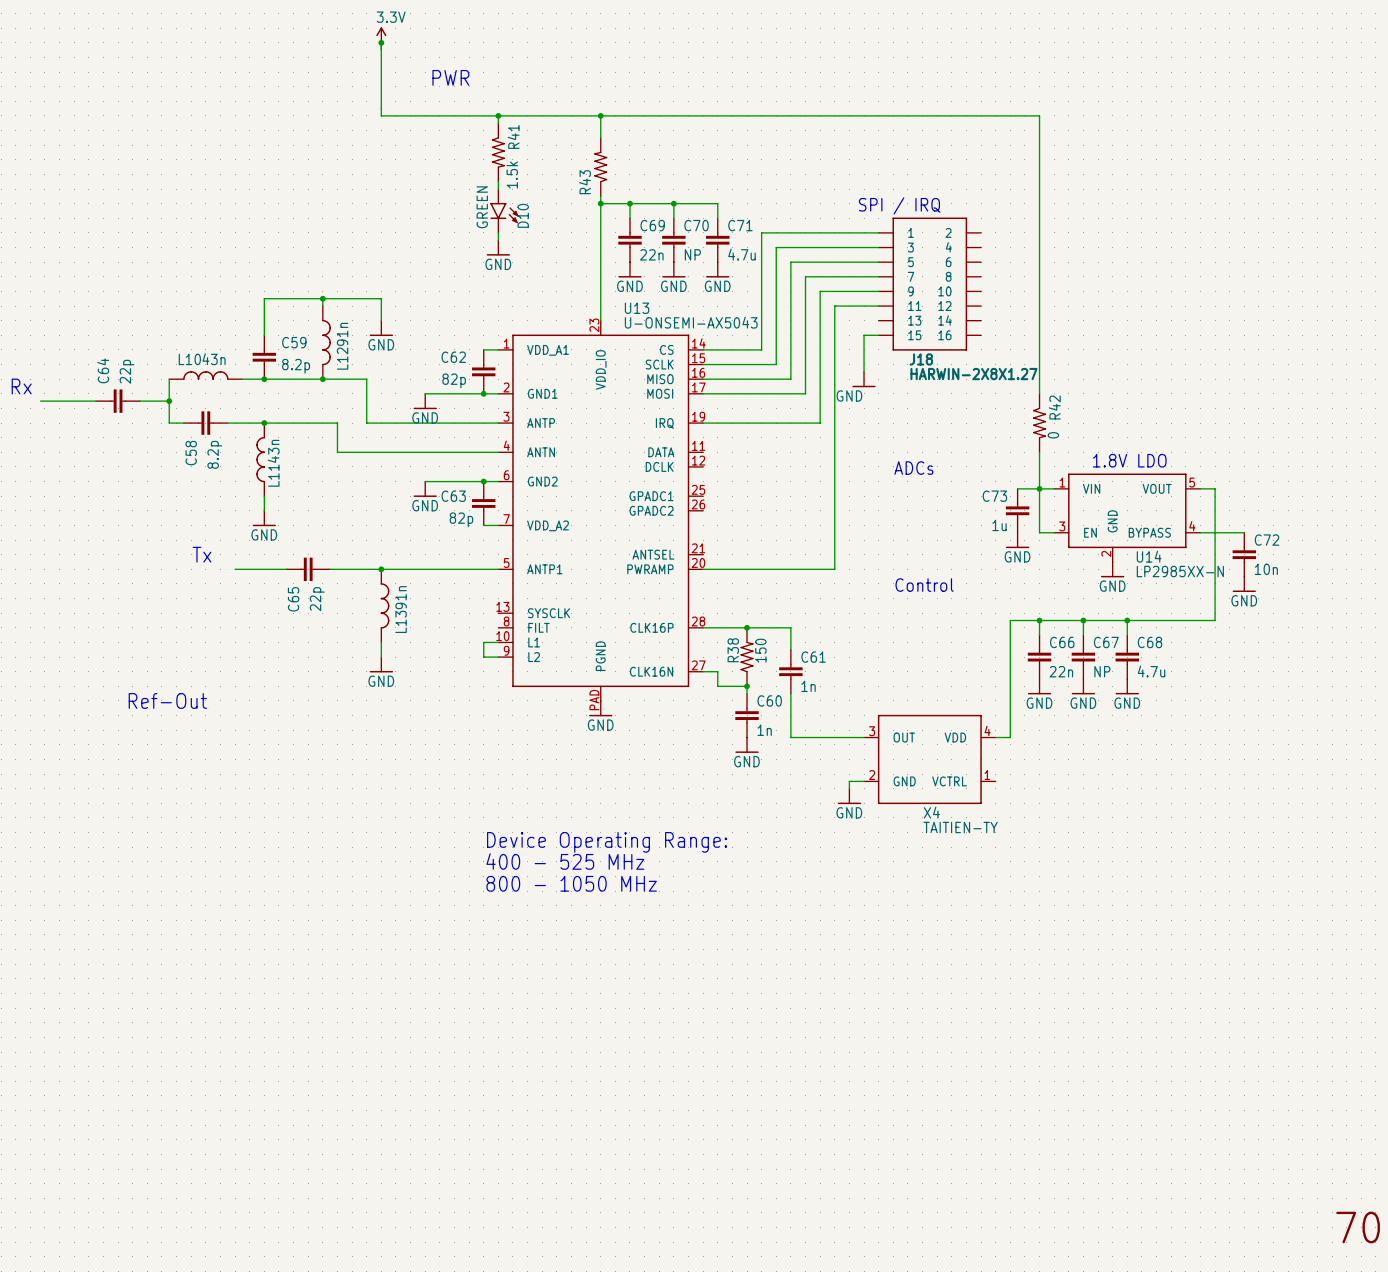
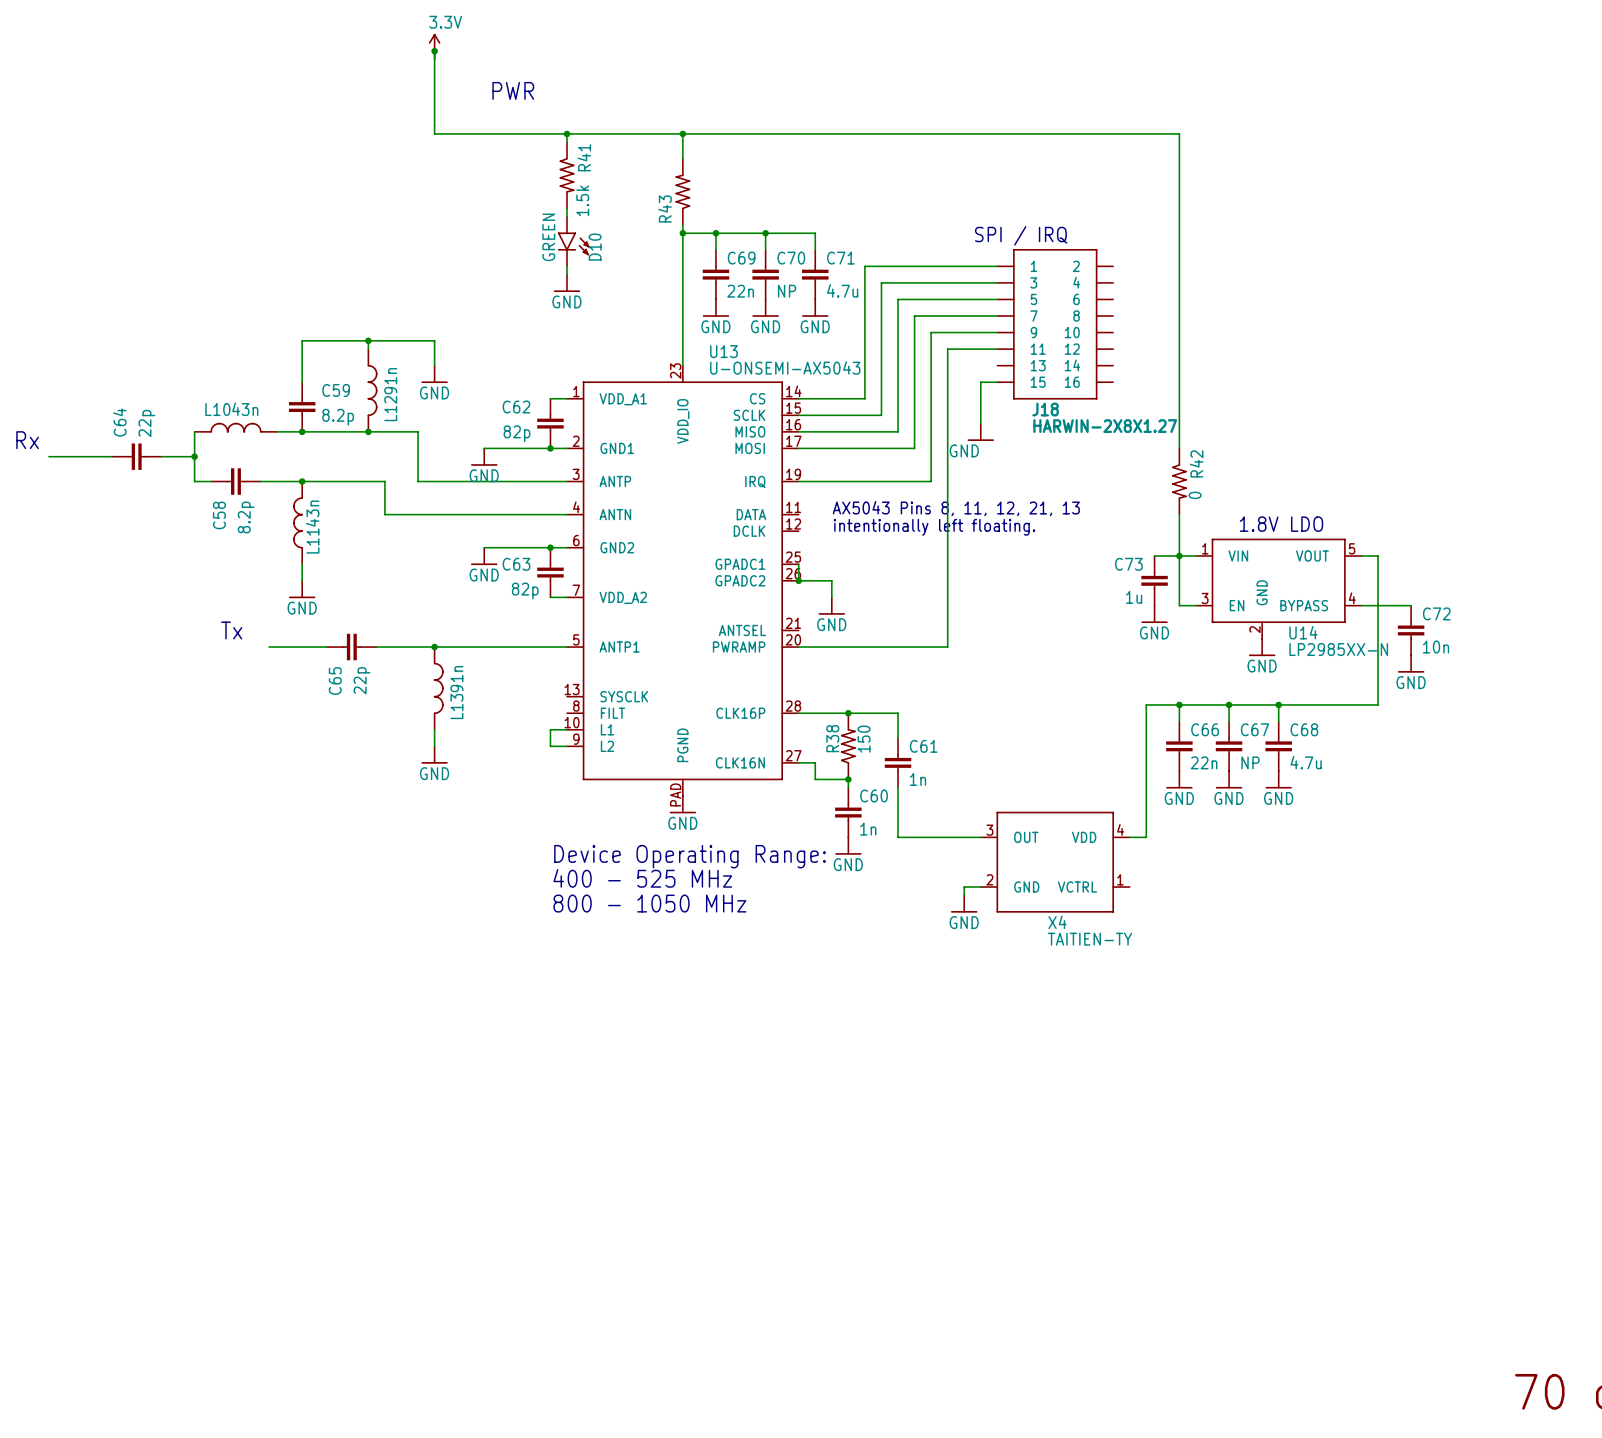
text: none -> AX5043 Pins 8, 11, 12, 21, 13 (956, 508)
text: none -> intentionally left floating. (934, 527)
text: ADCs (913, 468) -> none
wire: none -> (798, 564) (798, 580) (831, 580) (831, 597)
junction: none -> (798, 580)
power symbol: none -> GND (831, 606)
text: Control (924, 585) -> none
text: Ref-Out (167, 700) -> none
text position: Device Operating Range: (607, 842) -> Device Operating Range: (689, 856)
text position: 400 - 525 MHz (565, 861) -> 400 - 525 MHz (642, 878)
text position: 800 - 1050 MHz (571, 883) -> 800 - 1050 MHz (649, 903)

